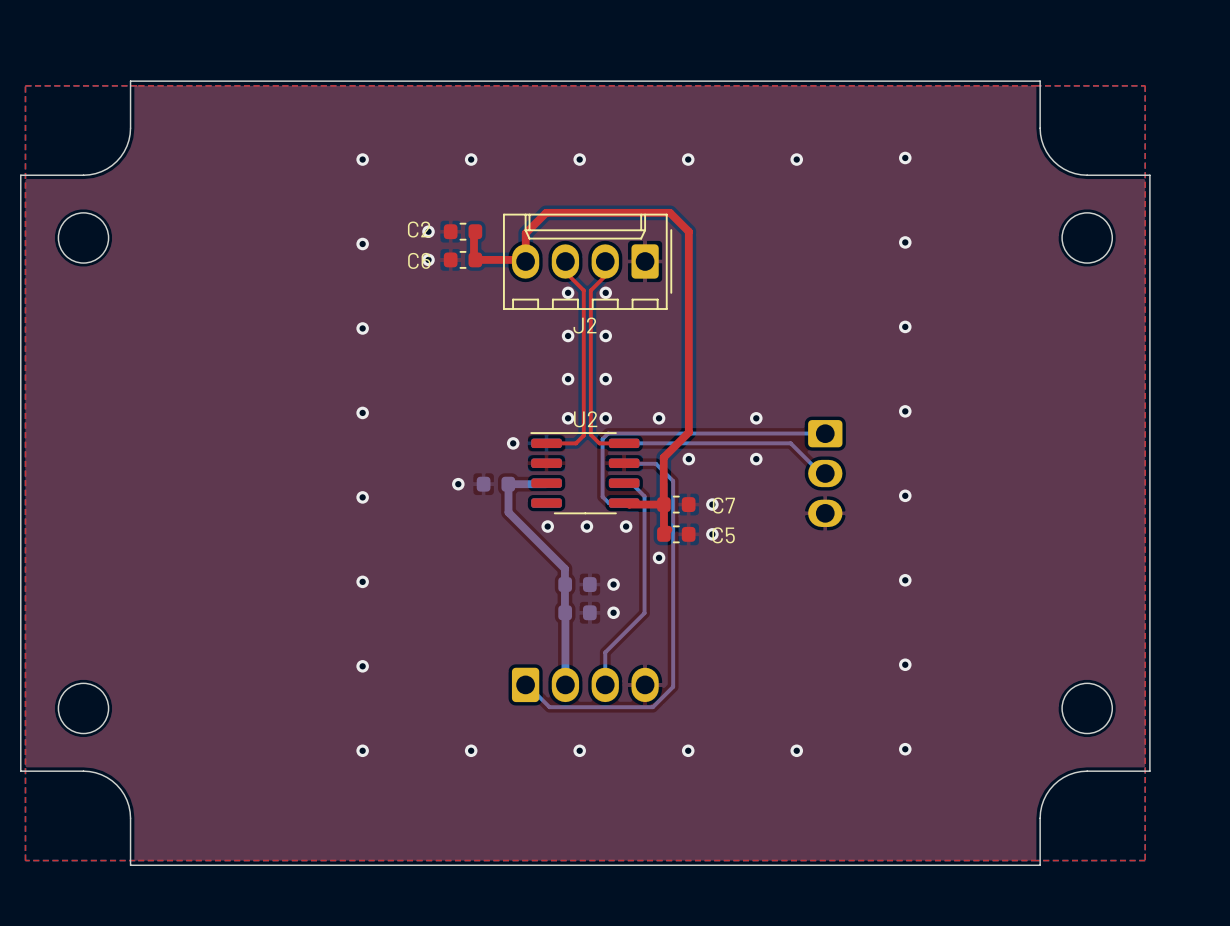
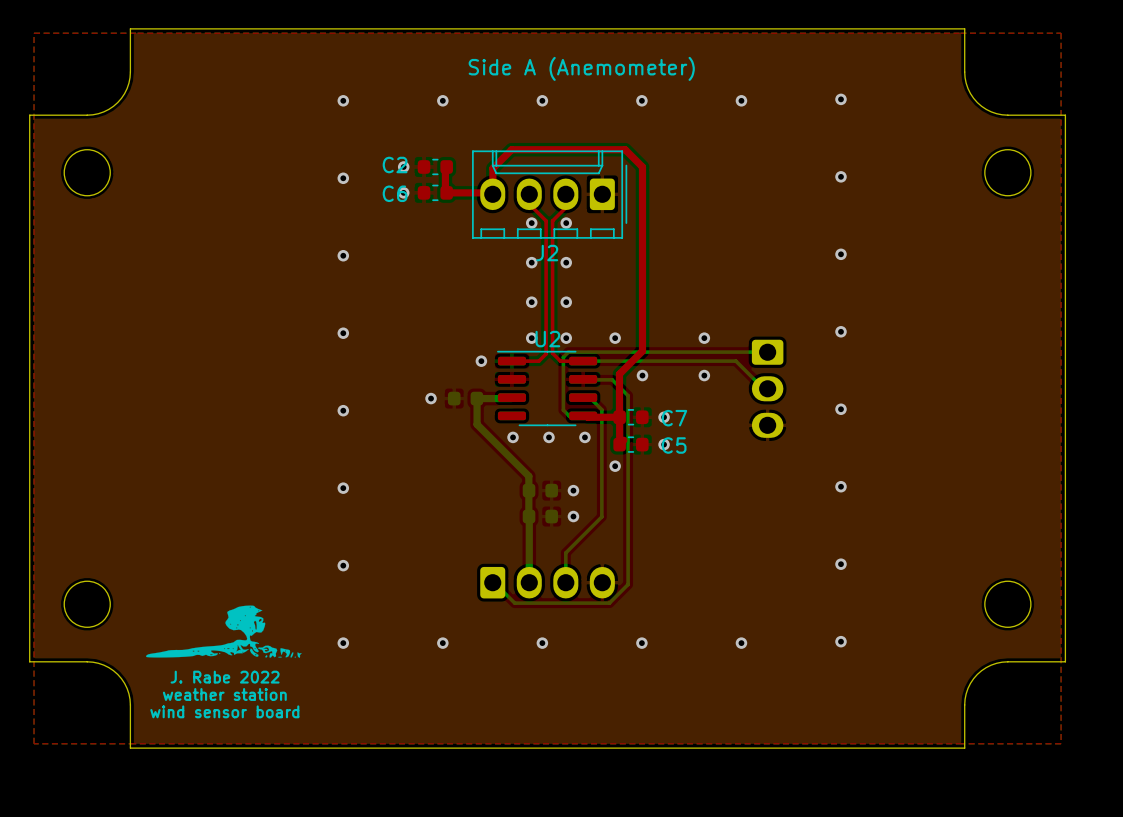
text: none -> Side A (Anemometer) (581, 68)
drawing: none -> [145, 605, 302, 658]
text: none -> J. Rabe 2022 (225, 677)
text: none -> weather station (224, 694)
text: none -> wind sensor board (224, 711)

